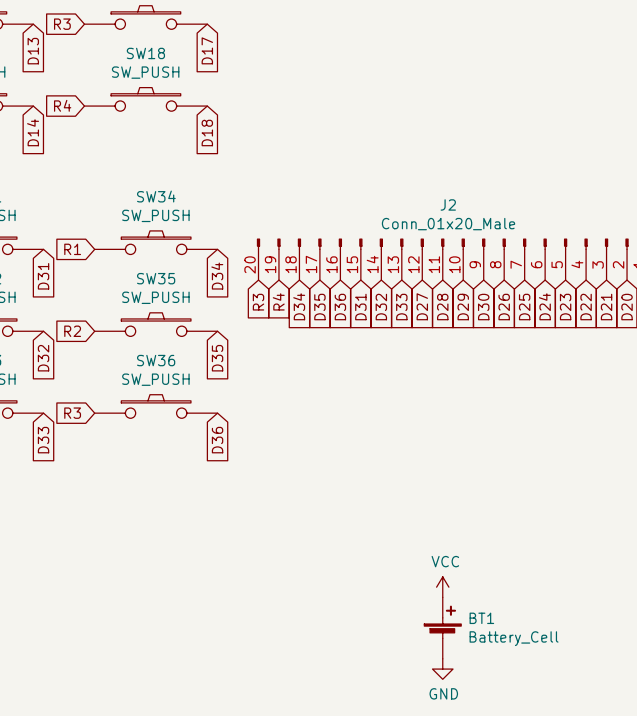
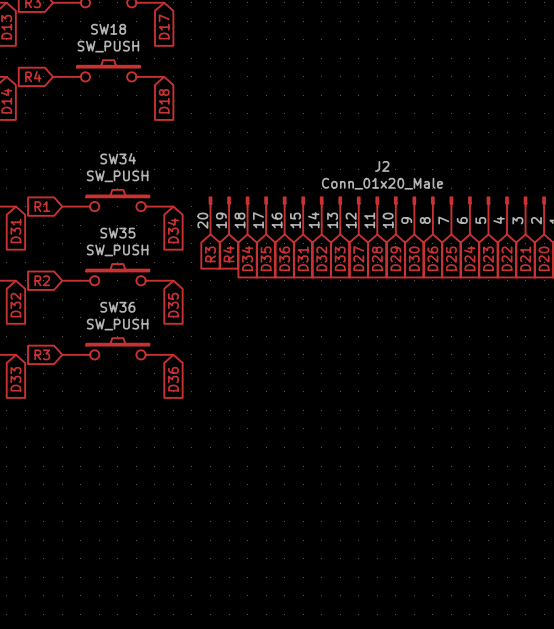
power symbol: VCC (442, 587) -> none
BT1: Battery_Cell (442, 628) -> none
power symbol: GND (442, 669) -> none

